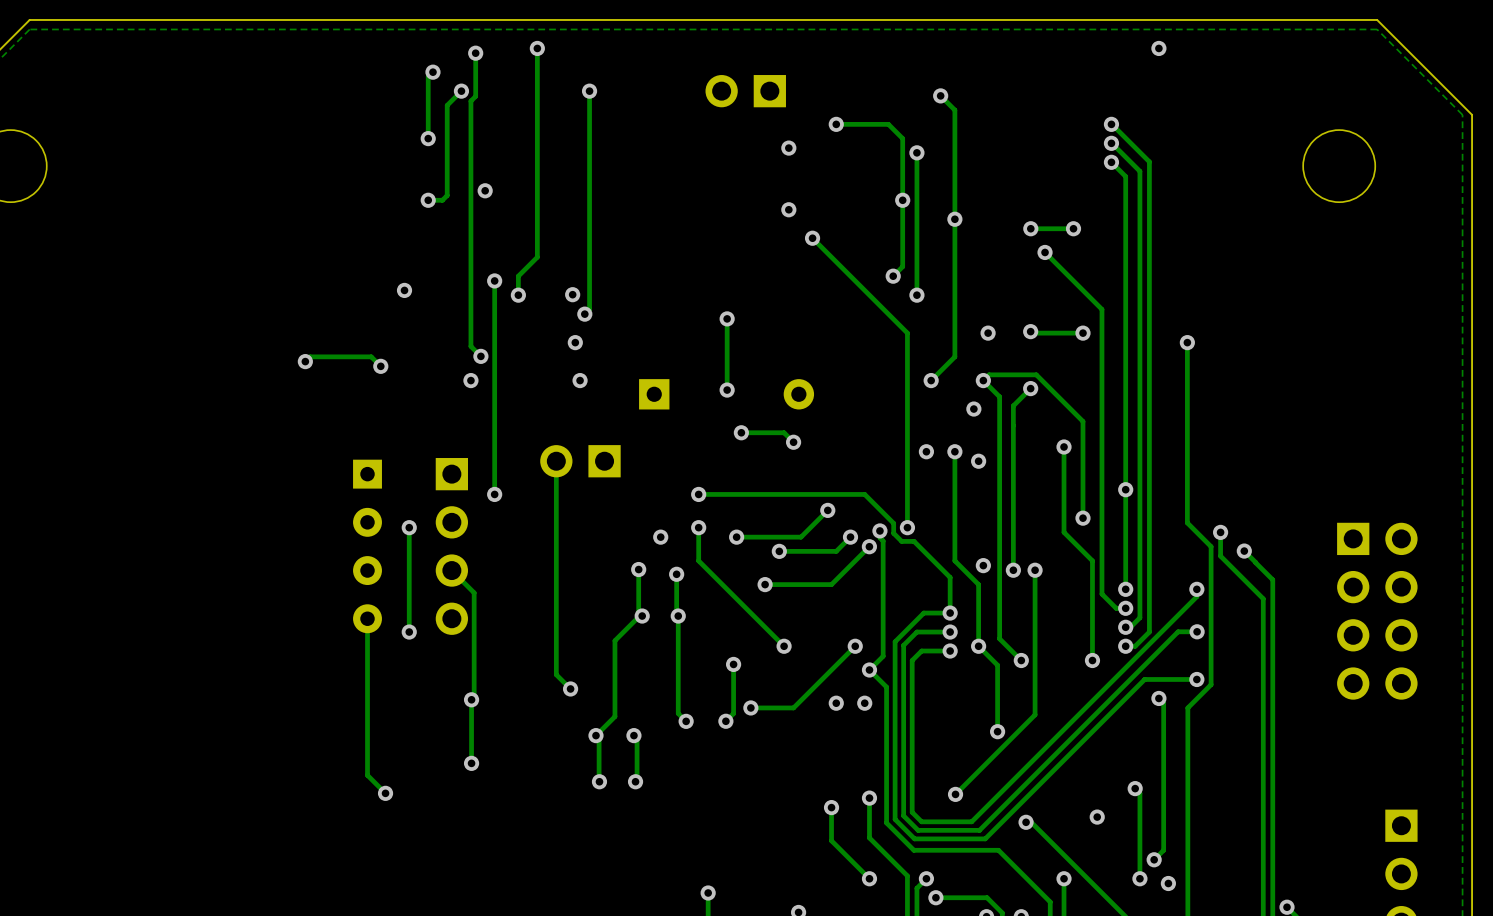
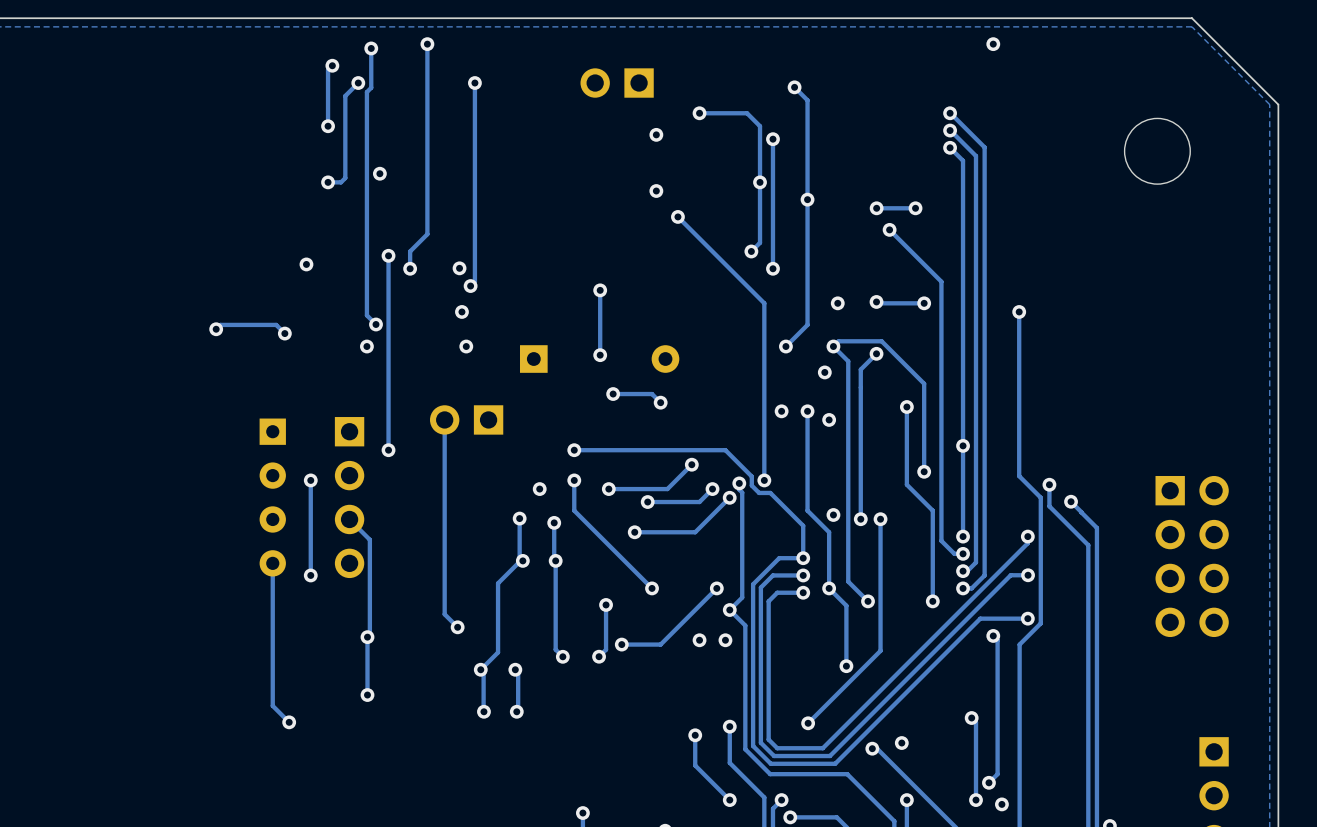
via position: (1097, 817) -> (901, 743)

